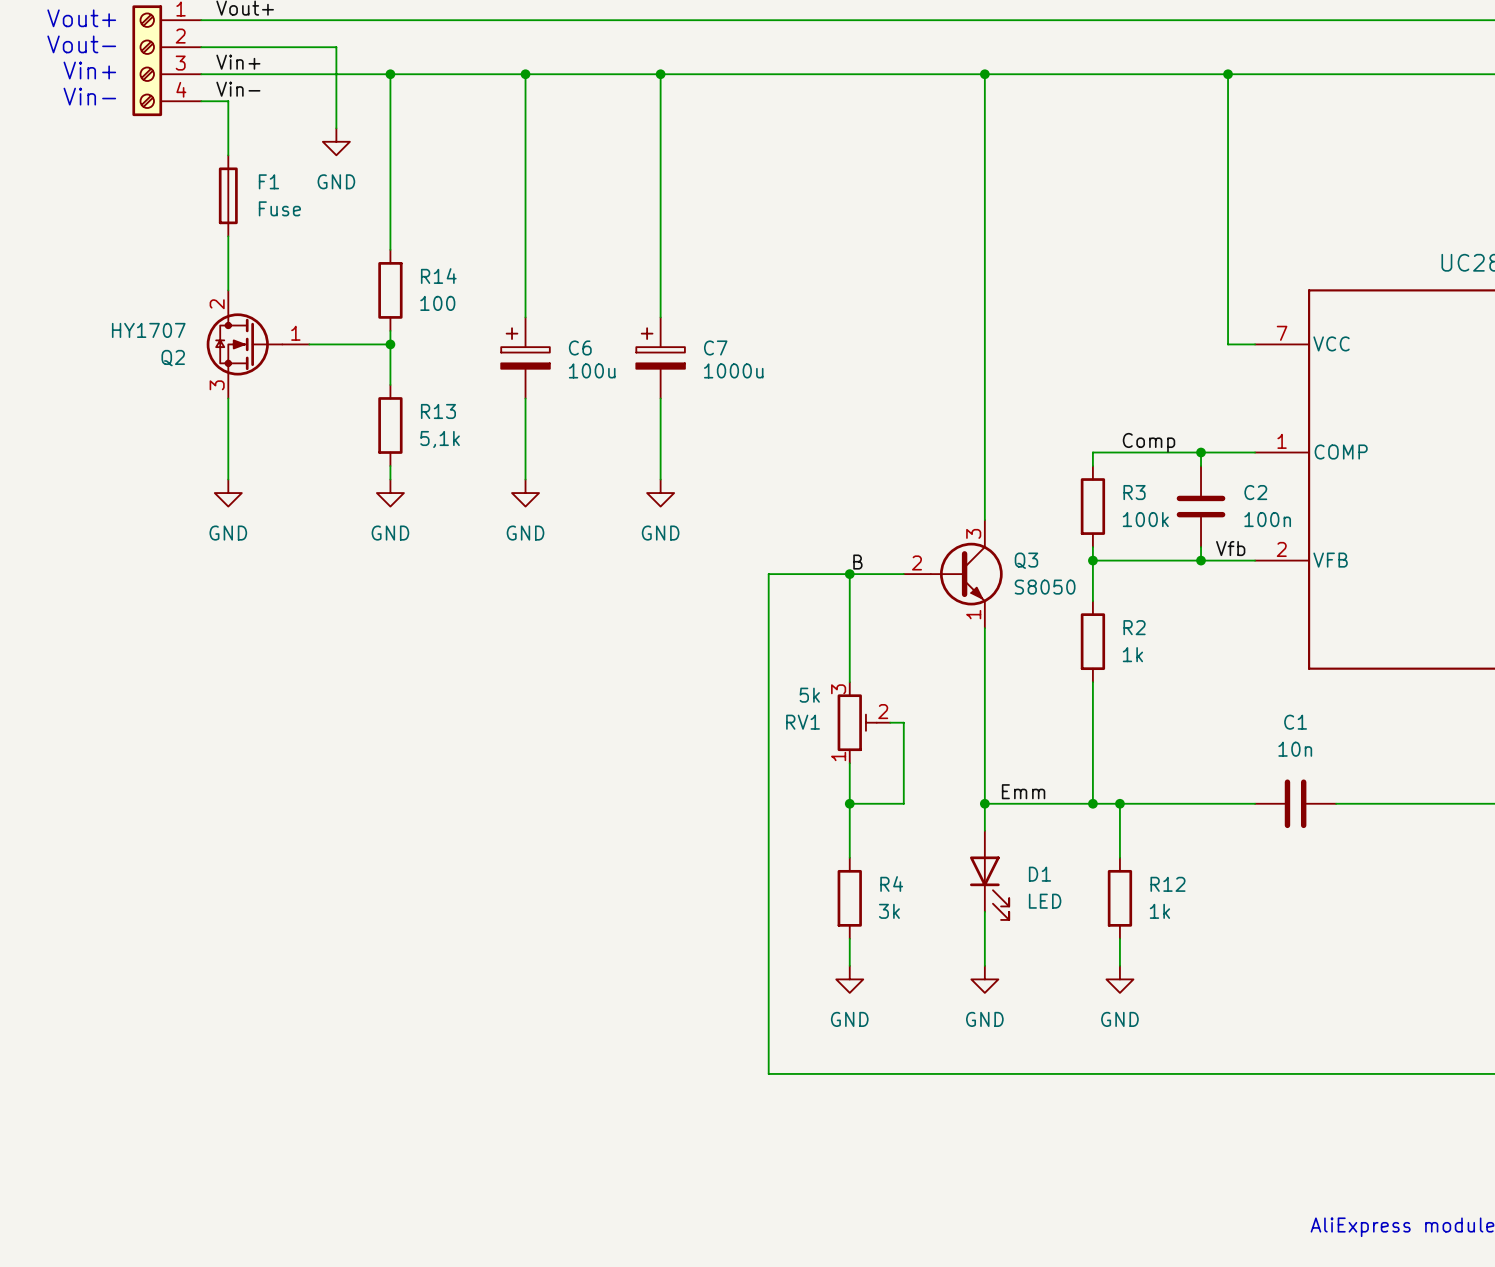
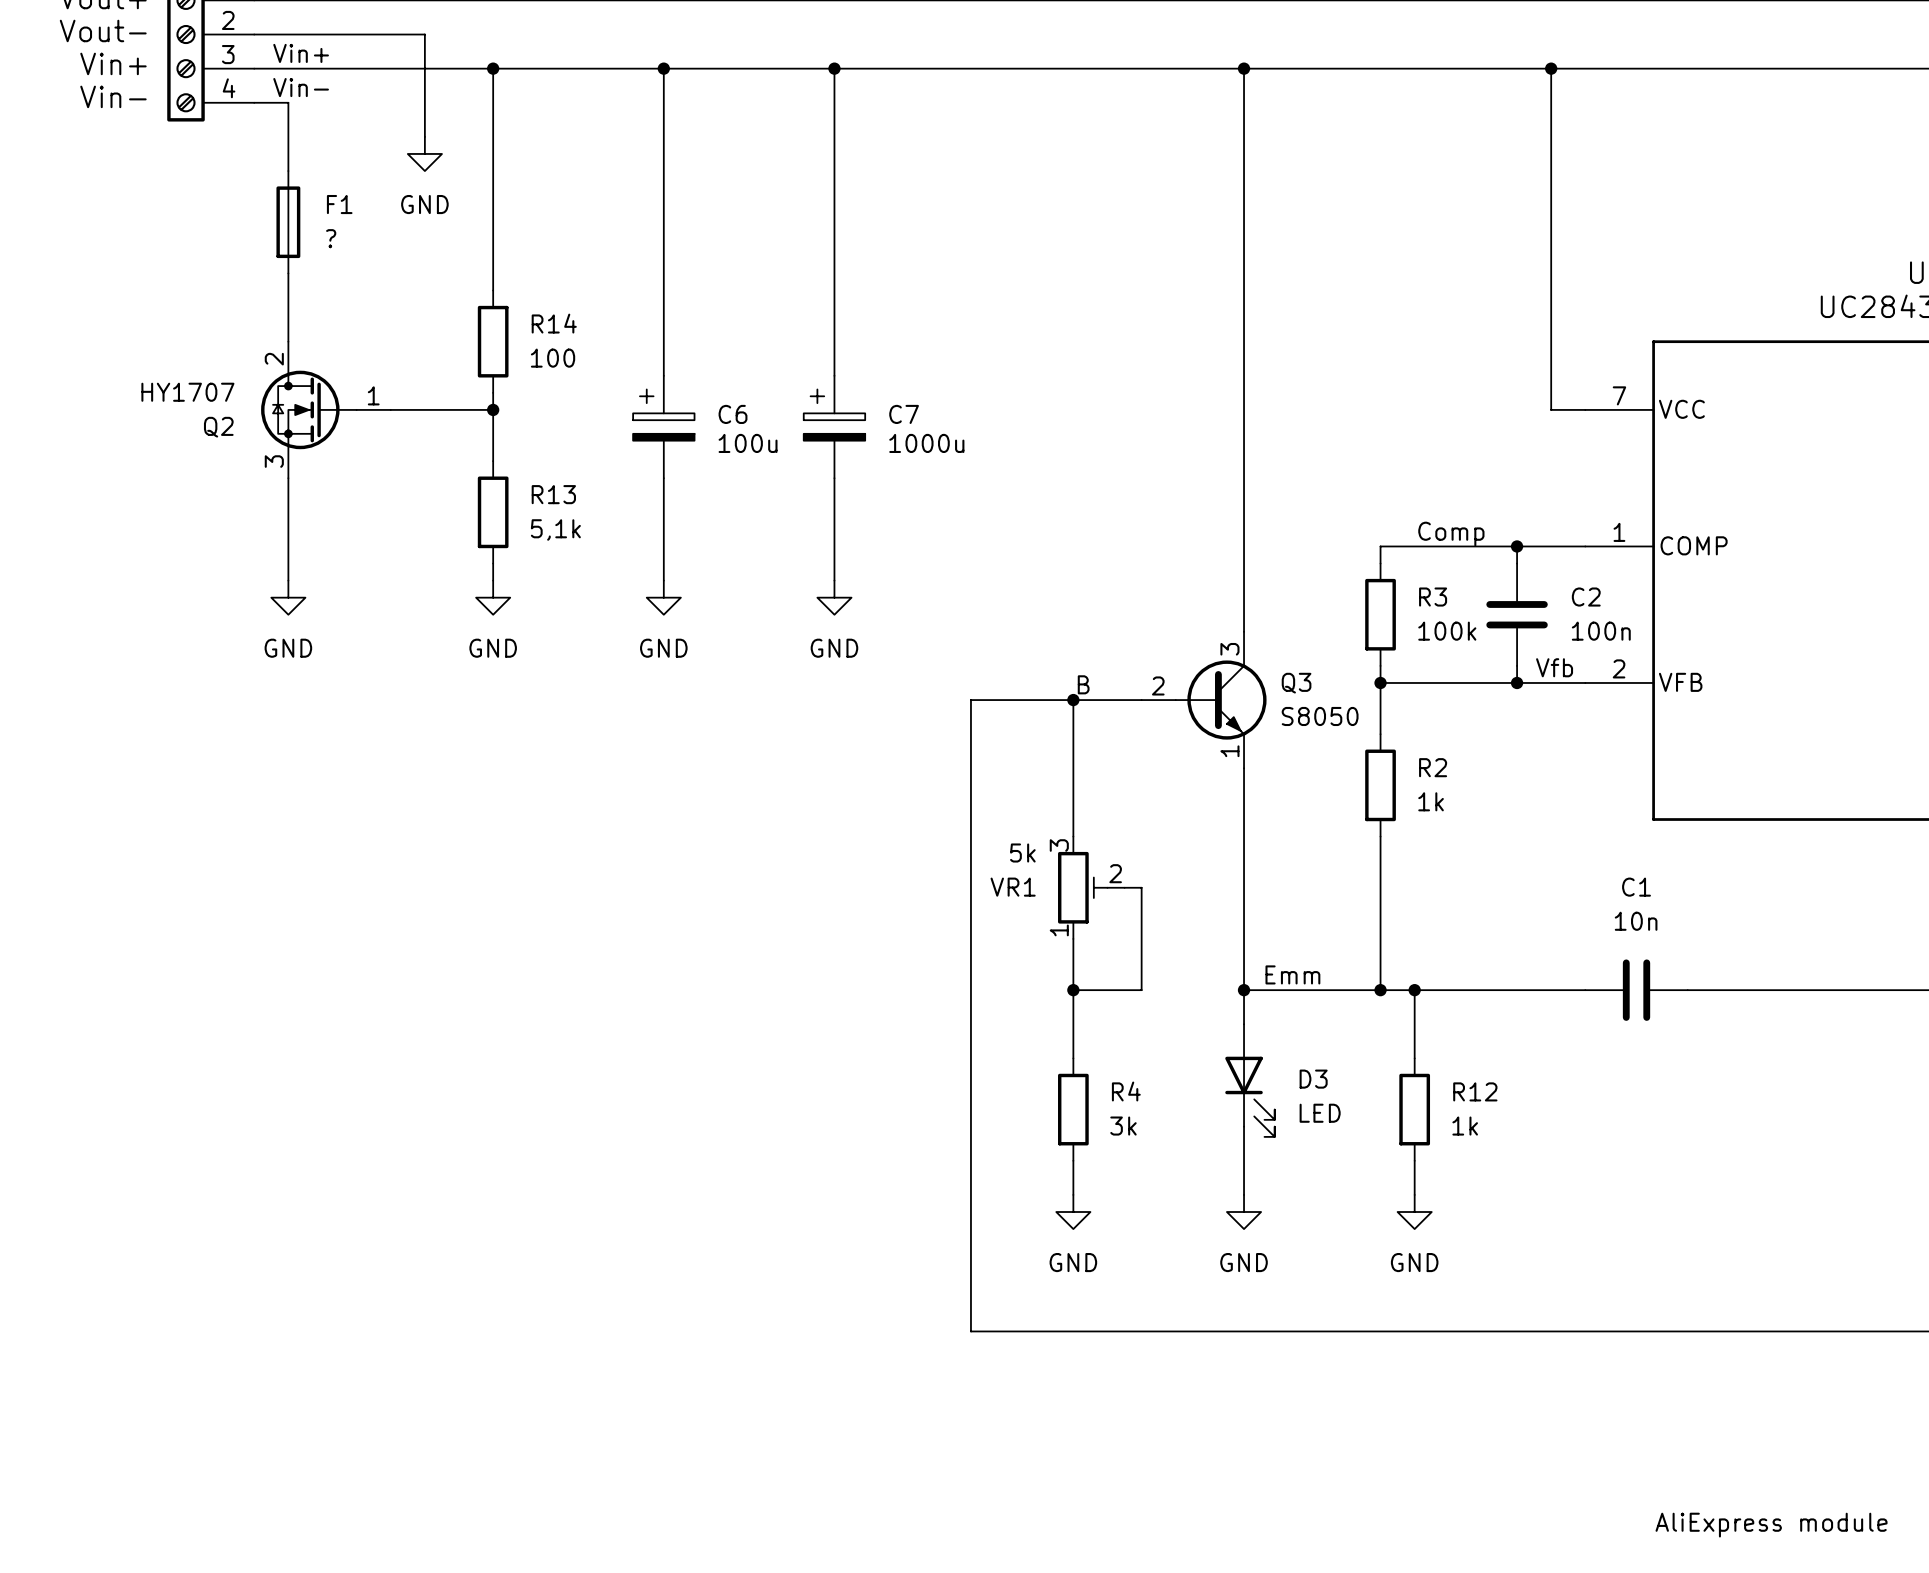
F1 value: Fuse (279, 208) -> ? (331, 238)
RV1 name: RV1 (803, 722) -> VR1 (1013, 887)
D1 name: D1 (1039, 874) -> D3 (1313, 1079)

